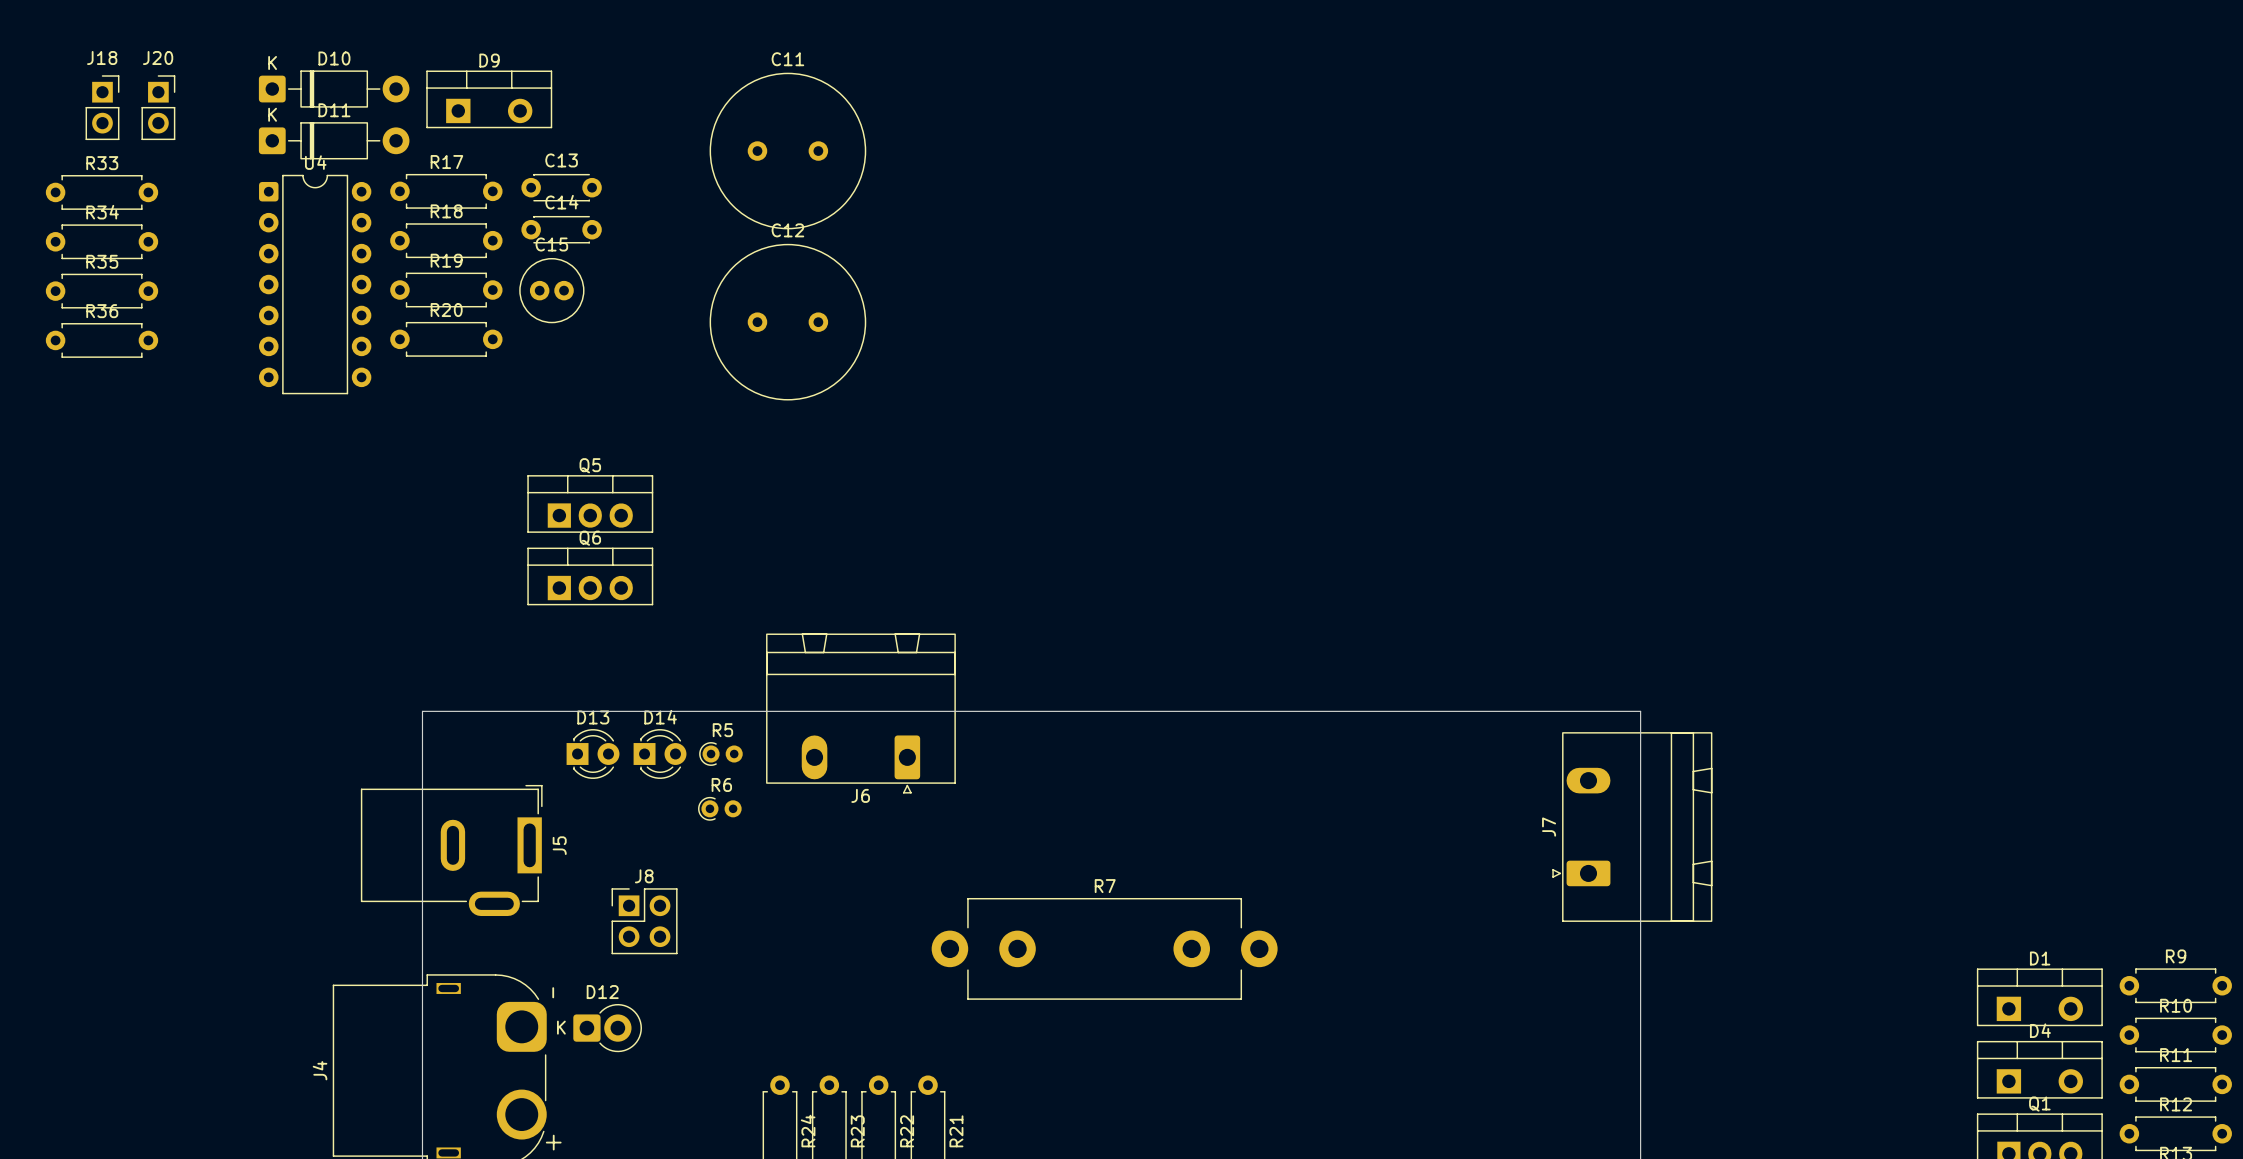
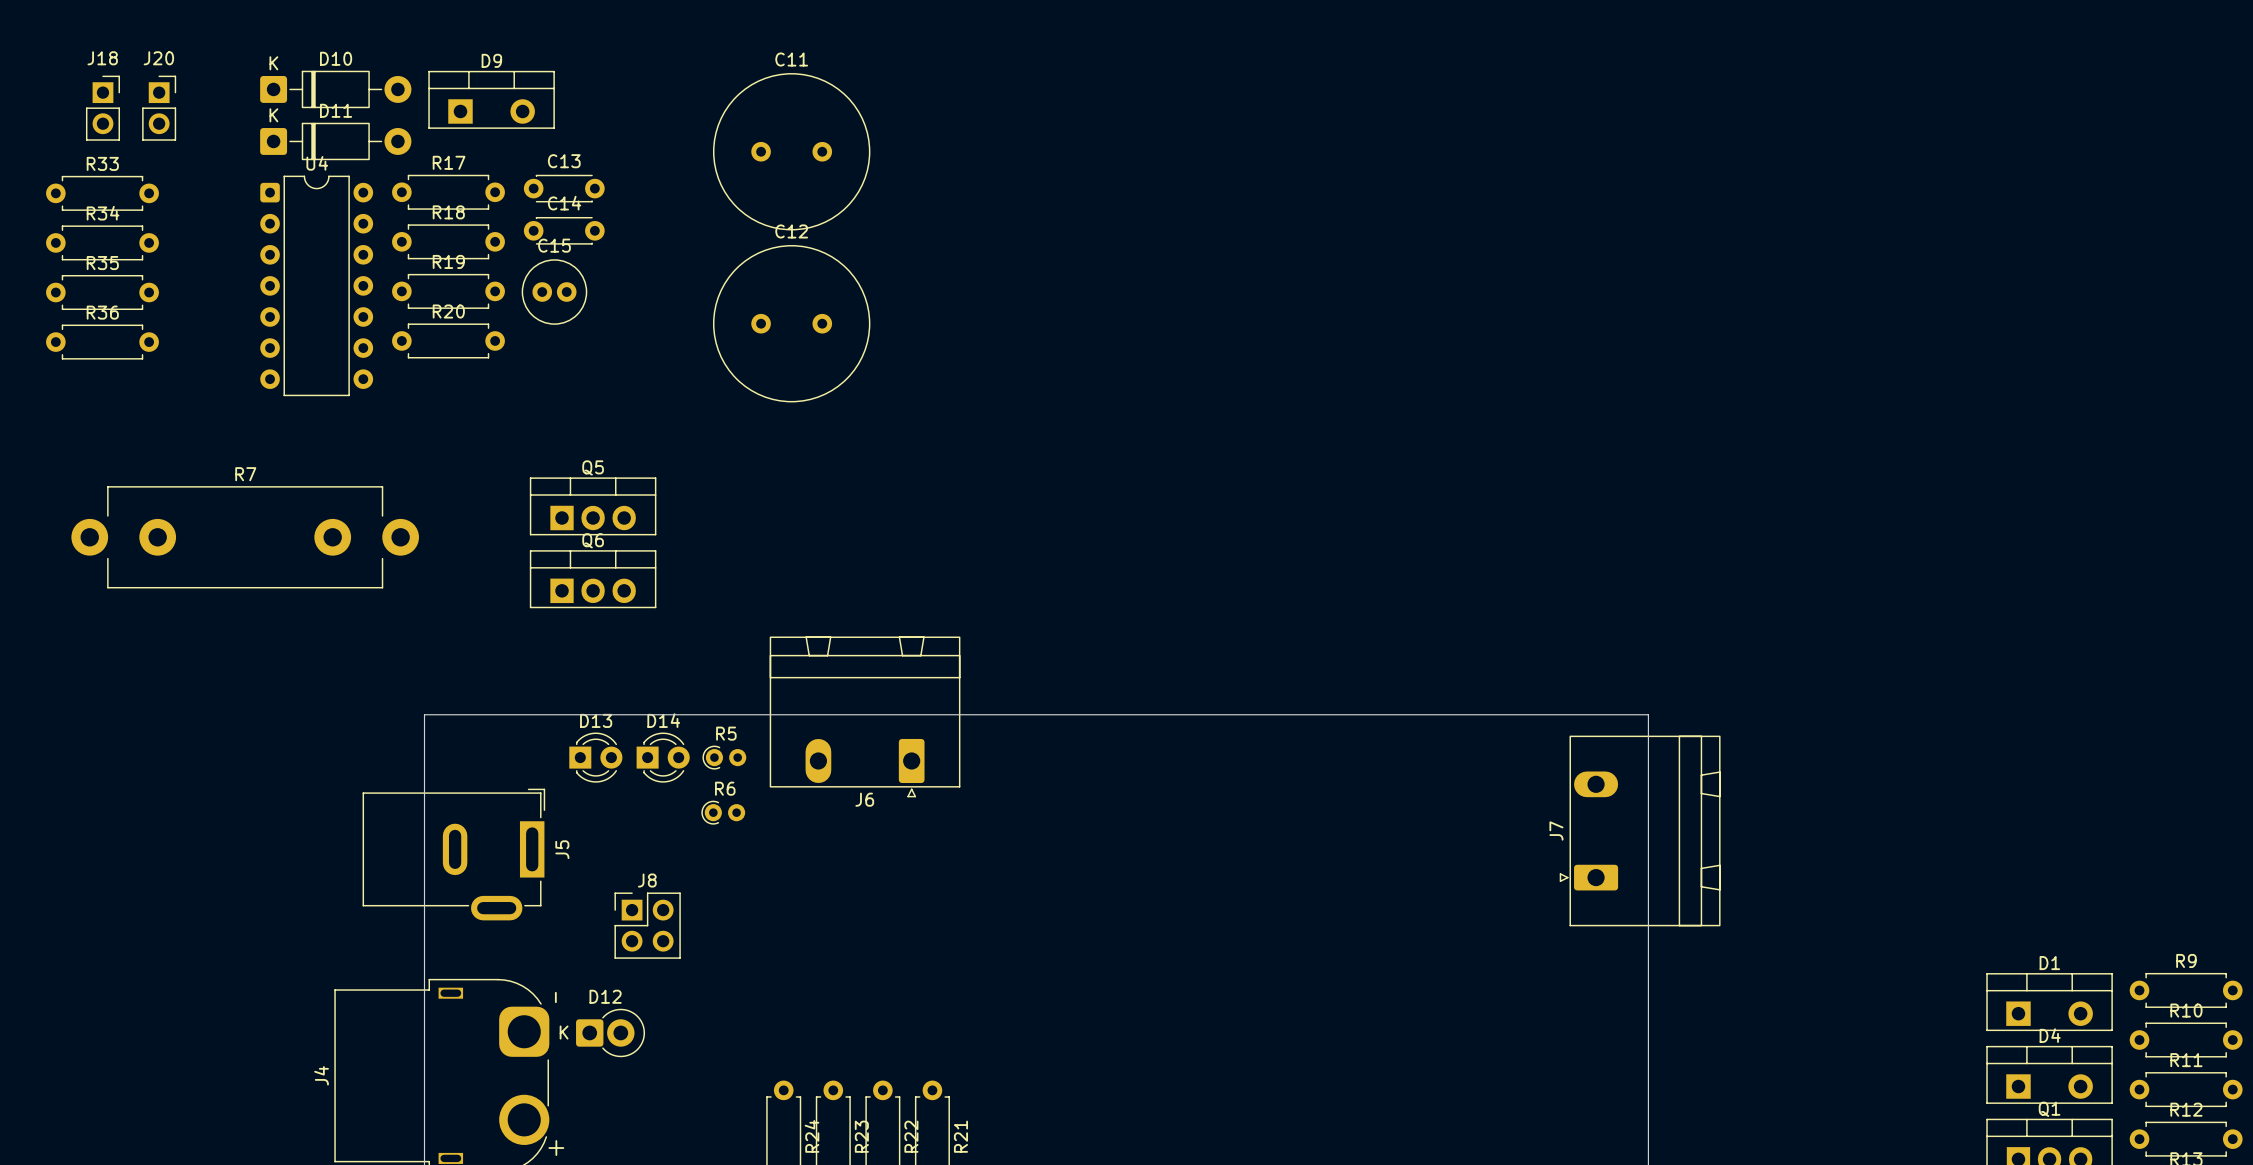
R7 position: (1104, 948) -> (245, 537)

